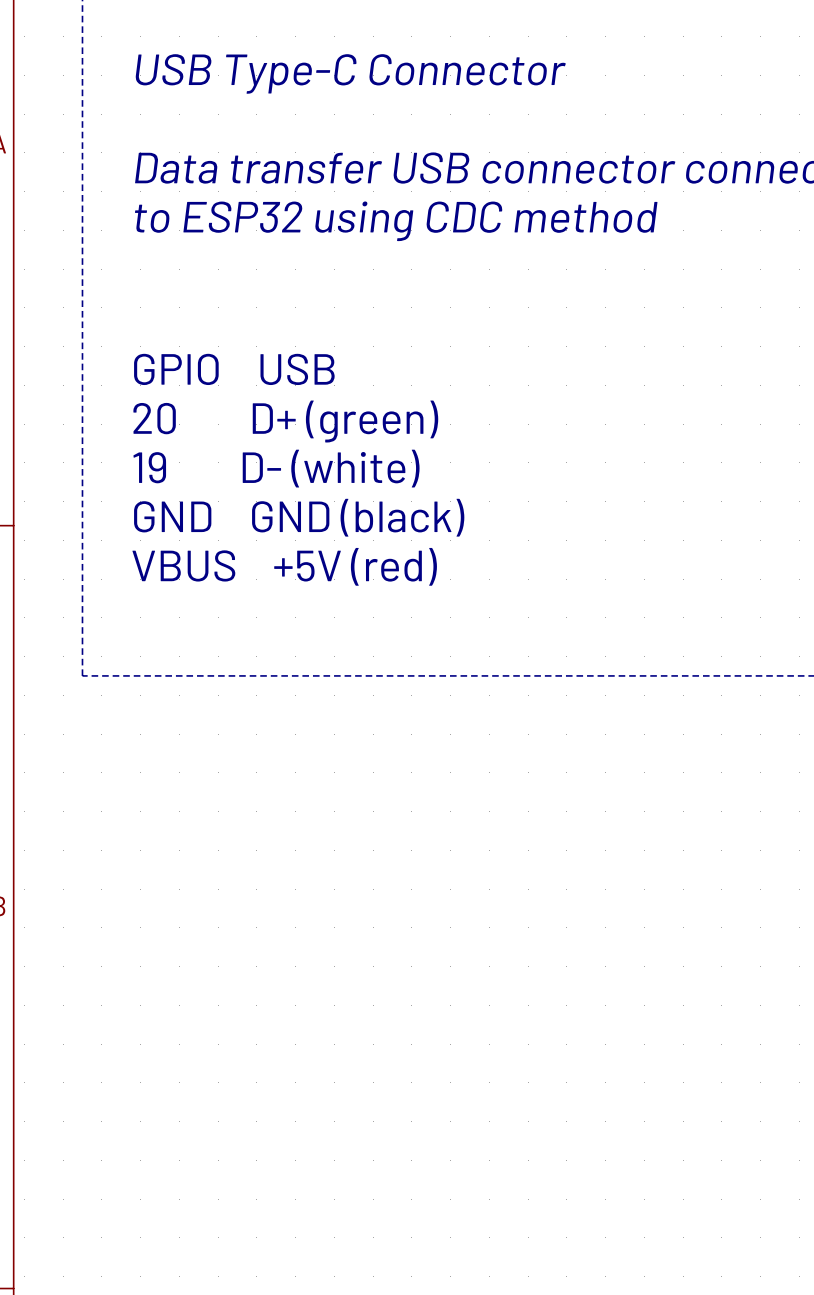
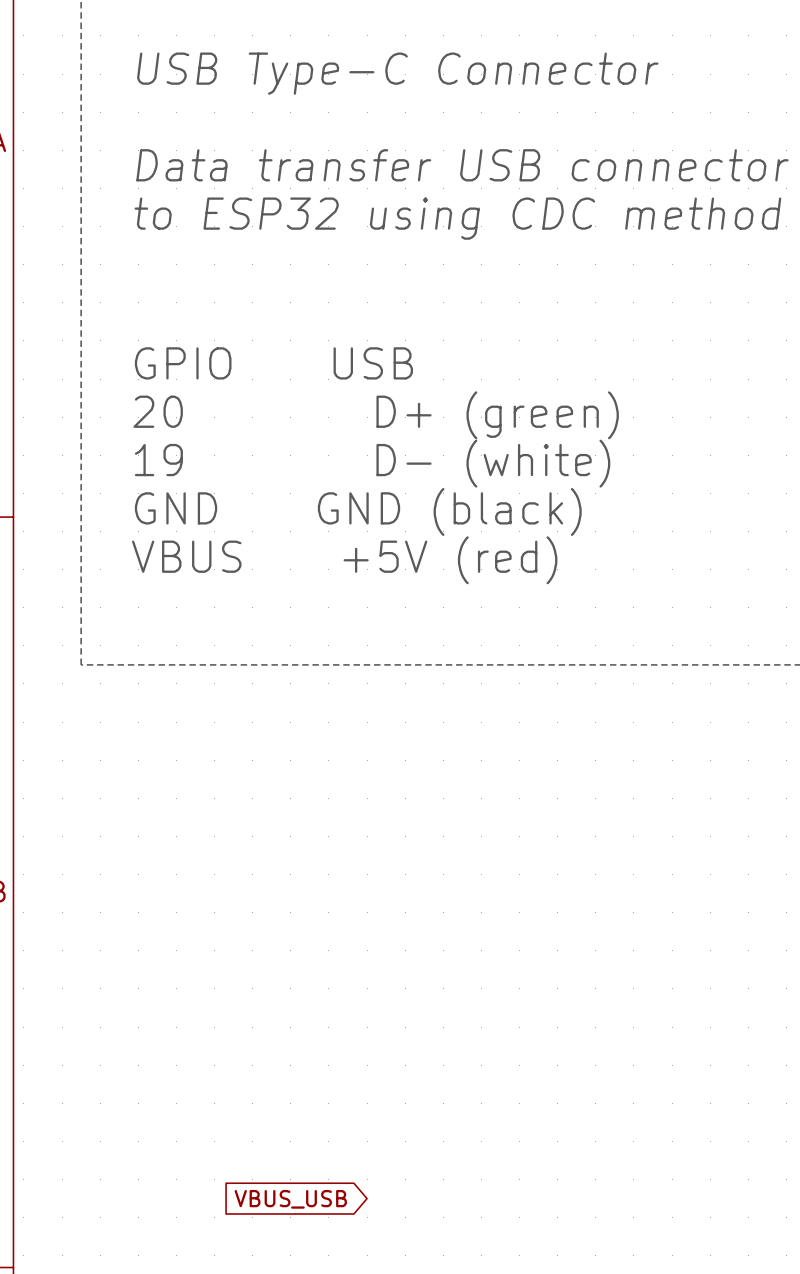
global label: none -> VBUS_USB (290, 1199)

